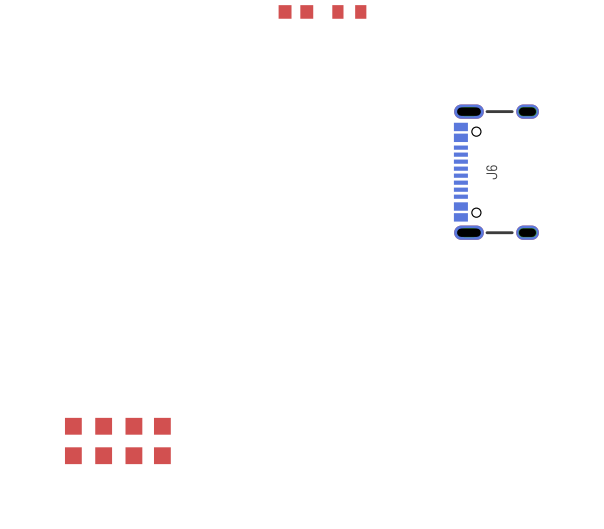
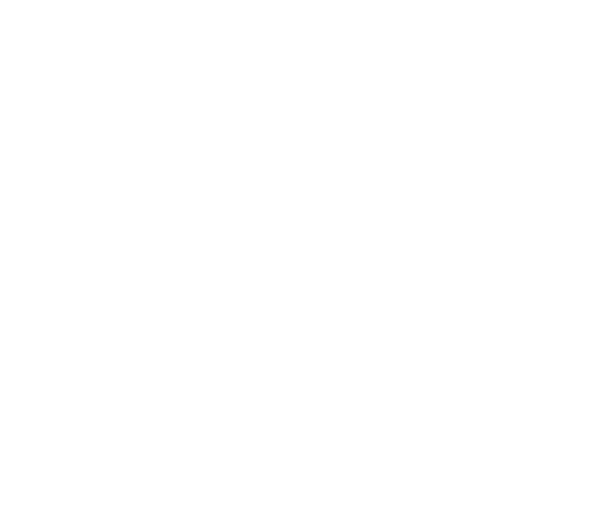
part: (295, 11) -> none
part: (349, 11) -> none
J6: (496, 172) -> none
part: (73, 440) -> none
part: (103, 440) -> none
part: (133, 440) -> none
part: (162, 440) -> none

